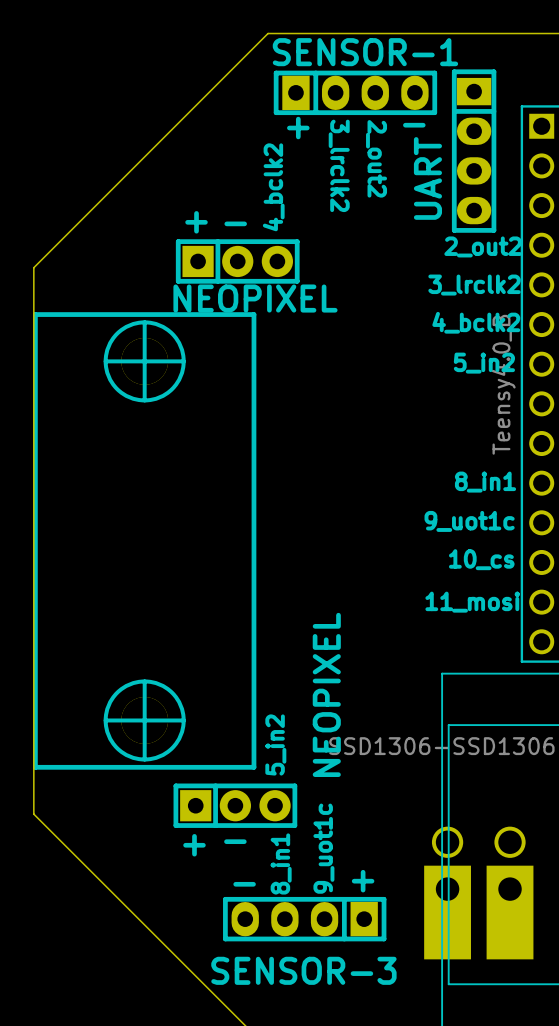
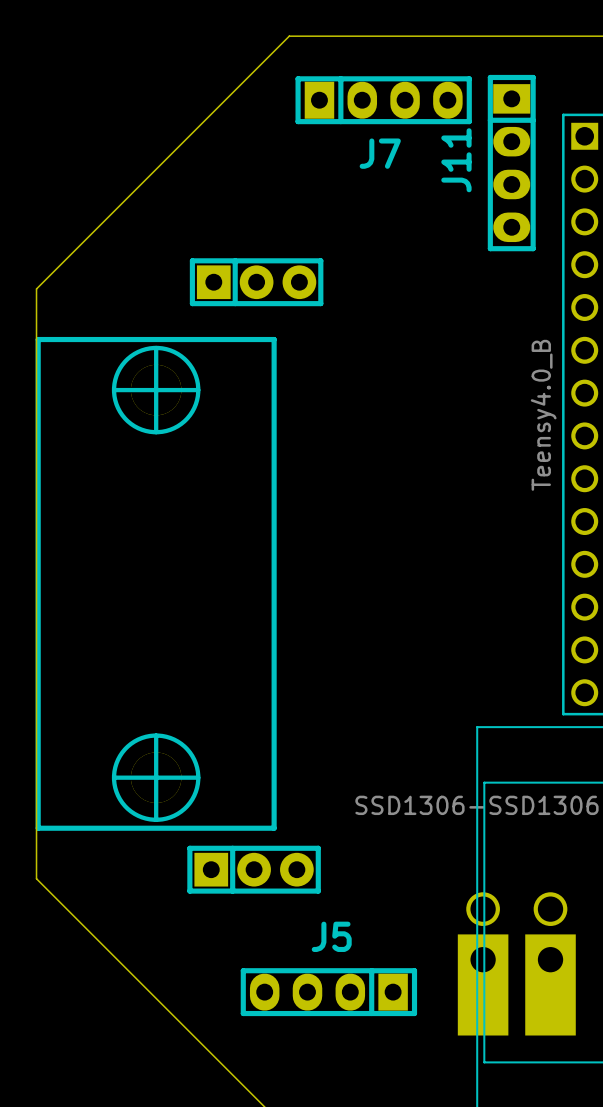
SENSOR-1 name: SENSOR-1 (365, 52) -> J7 (380, 153)
text: - (414, 125) -> none
text: + (298, 128) -> none
text: 2_out2 (376, 158) -> none
text: 3_lrclk2 (339, 165) -> none
UART name: UART (427, 178) -> J11 (456, 160)
text: 4_bclk2 (273, 187) -> none
text: + (196, 222) -> none
text: - (235, 223) -> none
text: 2_out2 (483, 246) -> none
text: 3_lrclk2 (474, 285) -> none
text: NEOPIXEL (255, 298) -> none
text: 4_bclk2 (476, 322) -> none
text: 5_in2 (484, 363) -> none
text: 8_in1 (485, 482) -> none
text: 9_uot1c (469, 521) -> none
text: 10_cs (481, 559) -> none
text: 11_mosi (472, 602) -> none
text: NEOPIXEL (326, 694) -> none
text: 5_in2 (275, 744) -> none
text: - (235, 841) -> none
text: + (194, 845) -> none
text: 9_uot1c (323, 848) -> none
text: 8_in1 (281, 863) -> none
text: + (363, 881) -> none
text: - (244, 884) -> none
SENSOR-3 name: SENSOR-3 (303, 970) -> J5 (331, 936)

